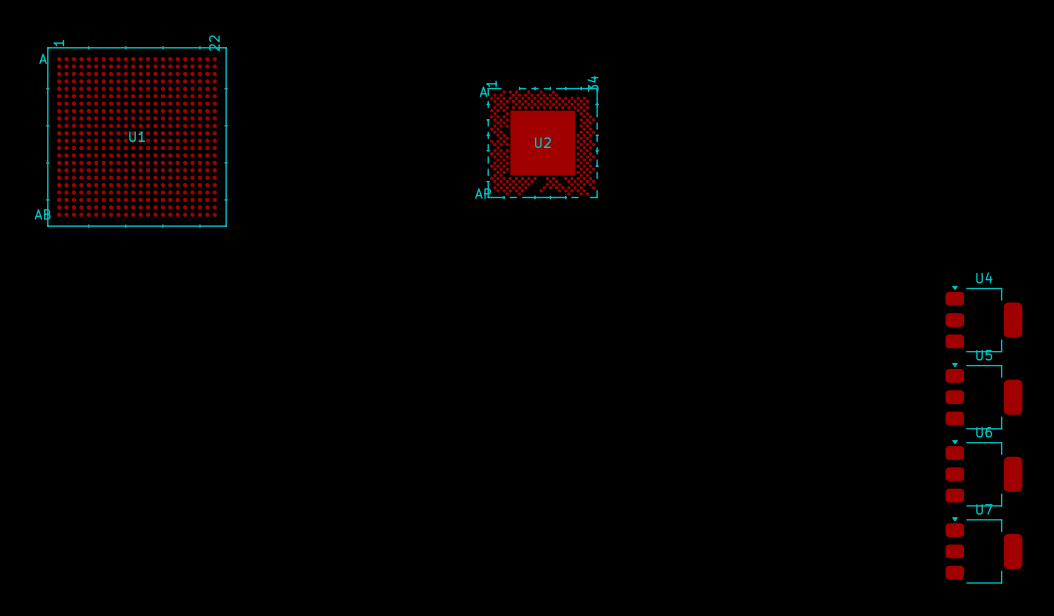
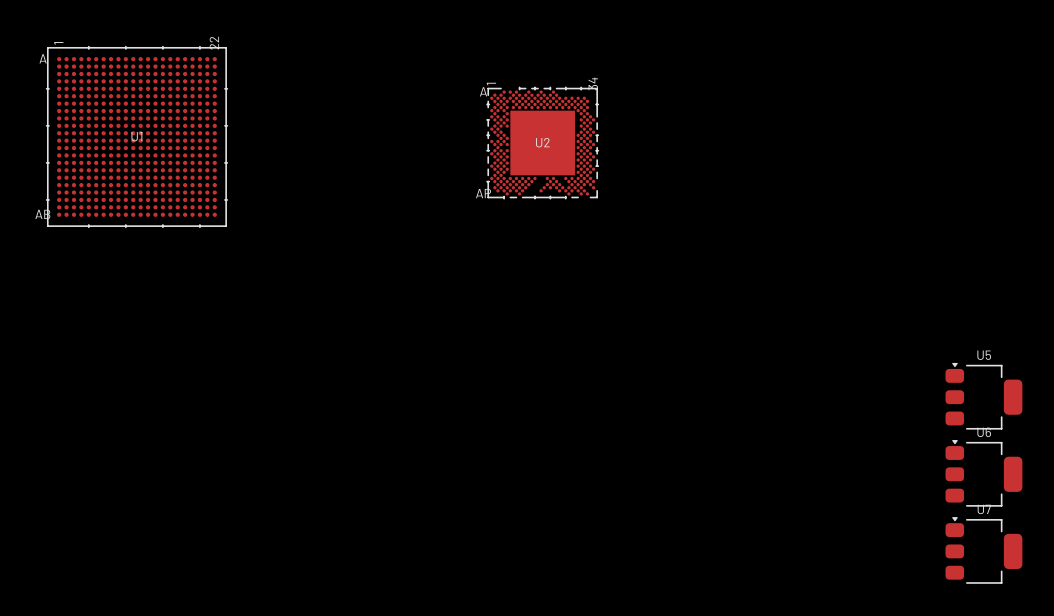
U4: (983, 319) -> none

